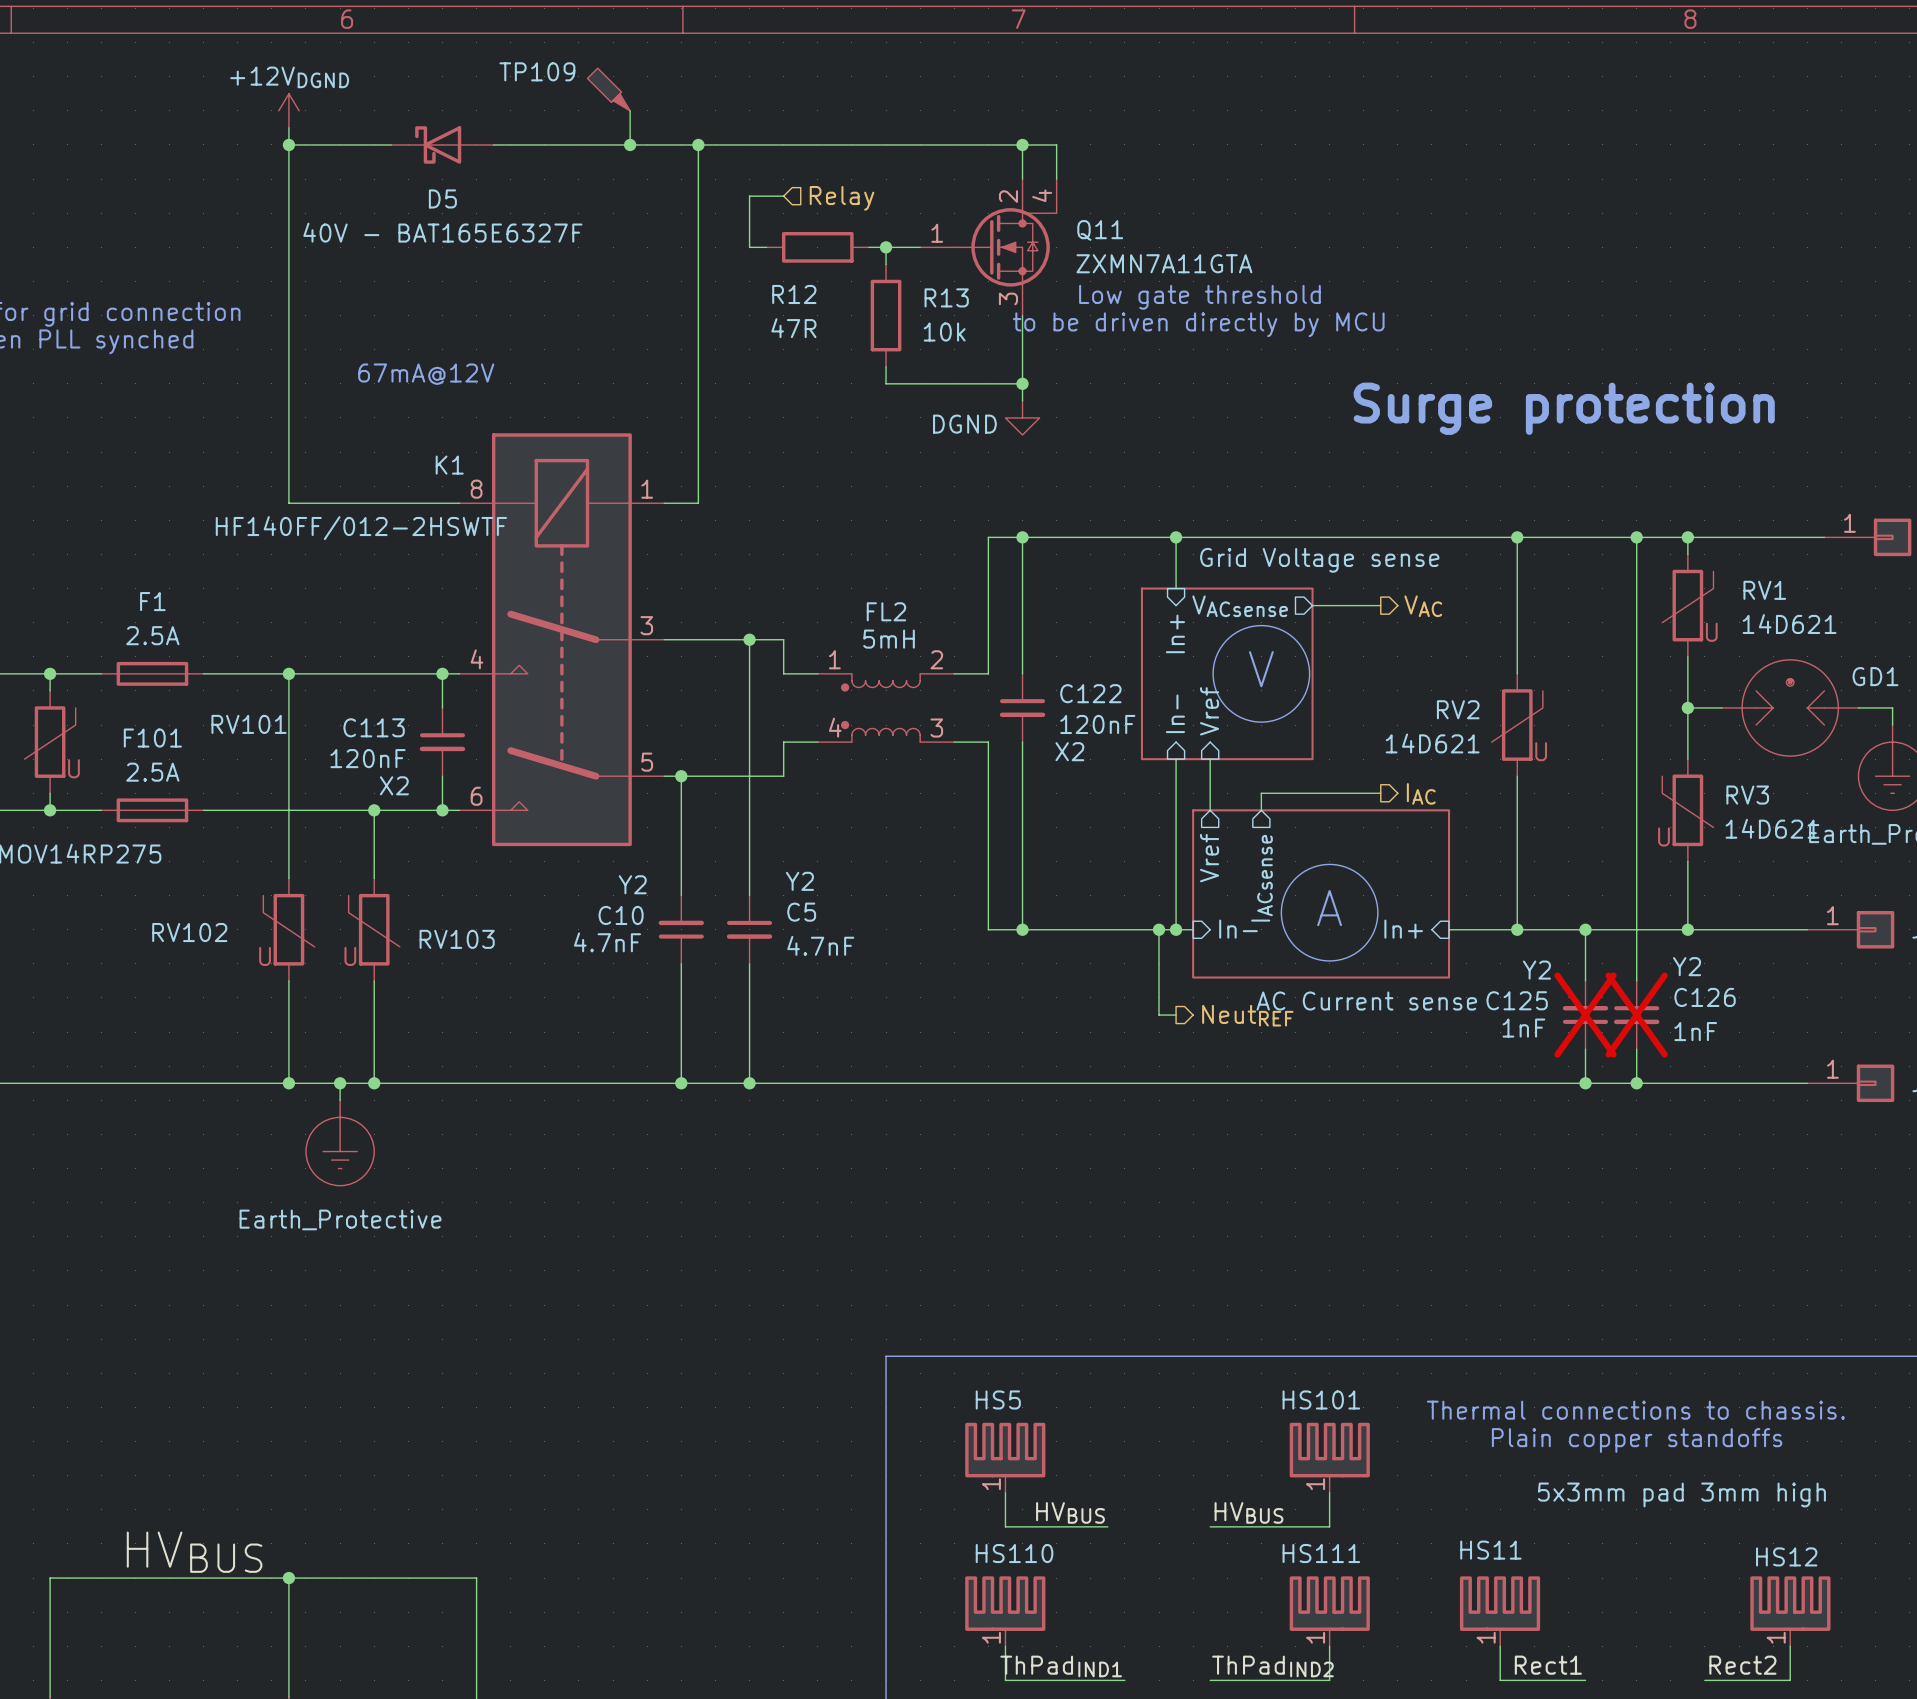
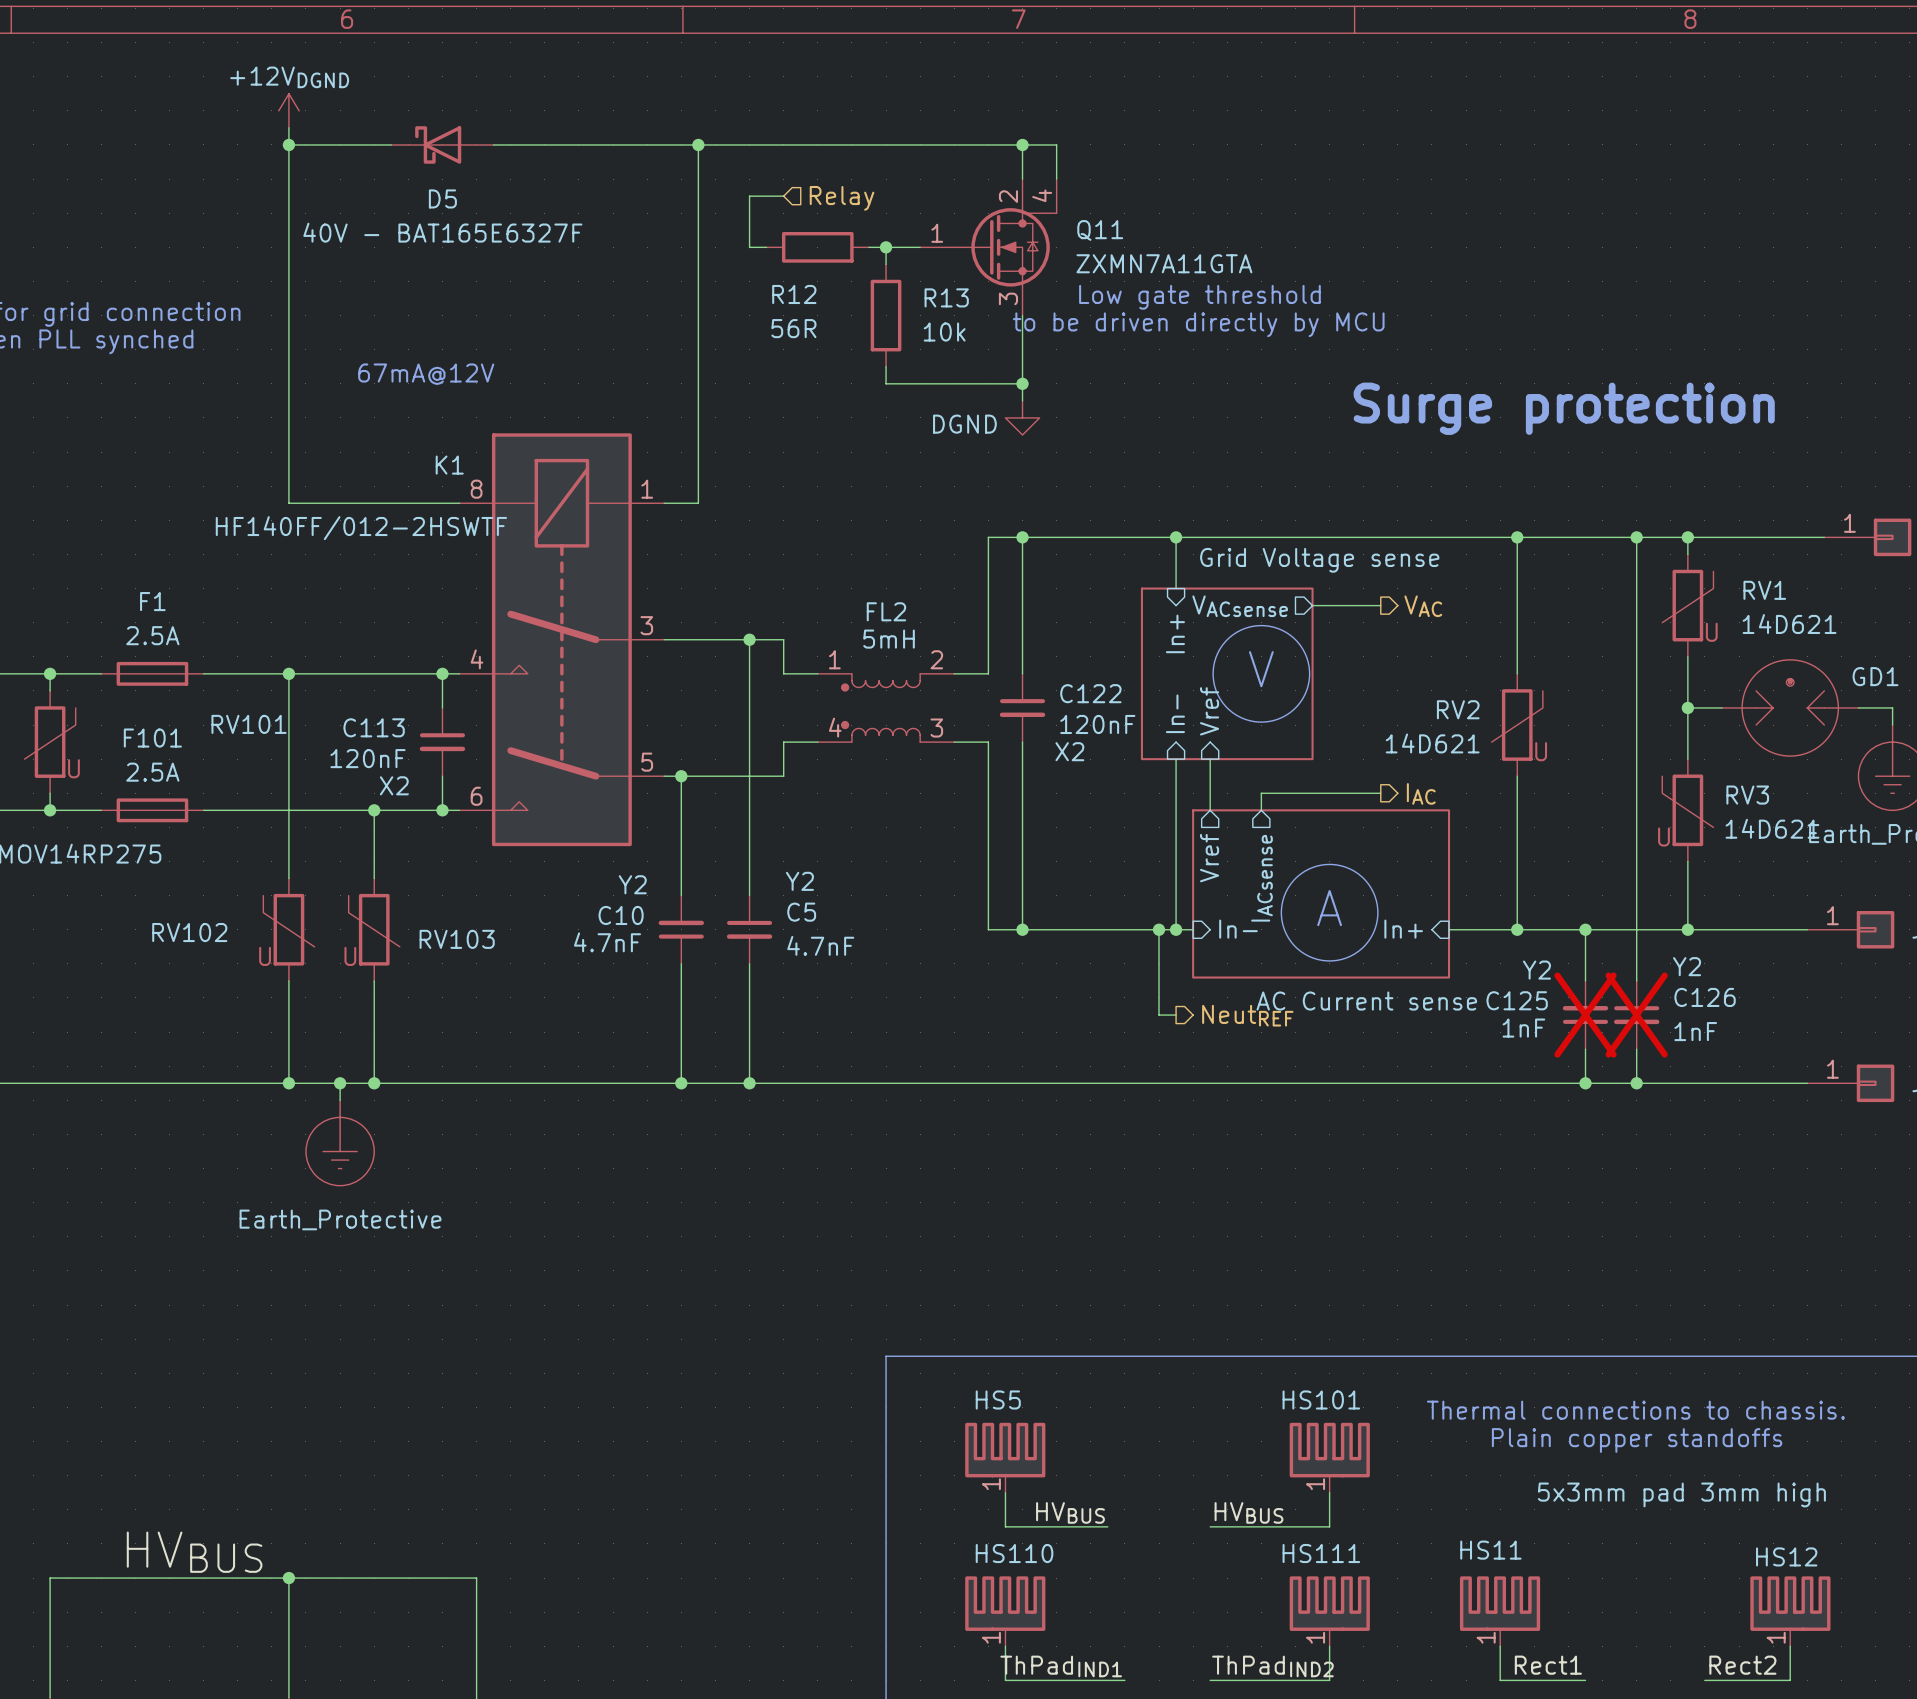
TP109: (608, 89) -> none
wire: (630, 110) (630, 144) -> none
junction: (630, 144) -> none
R12 value: 47R (793, 328) -> 56R (793, 328)

